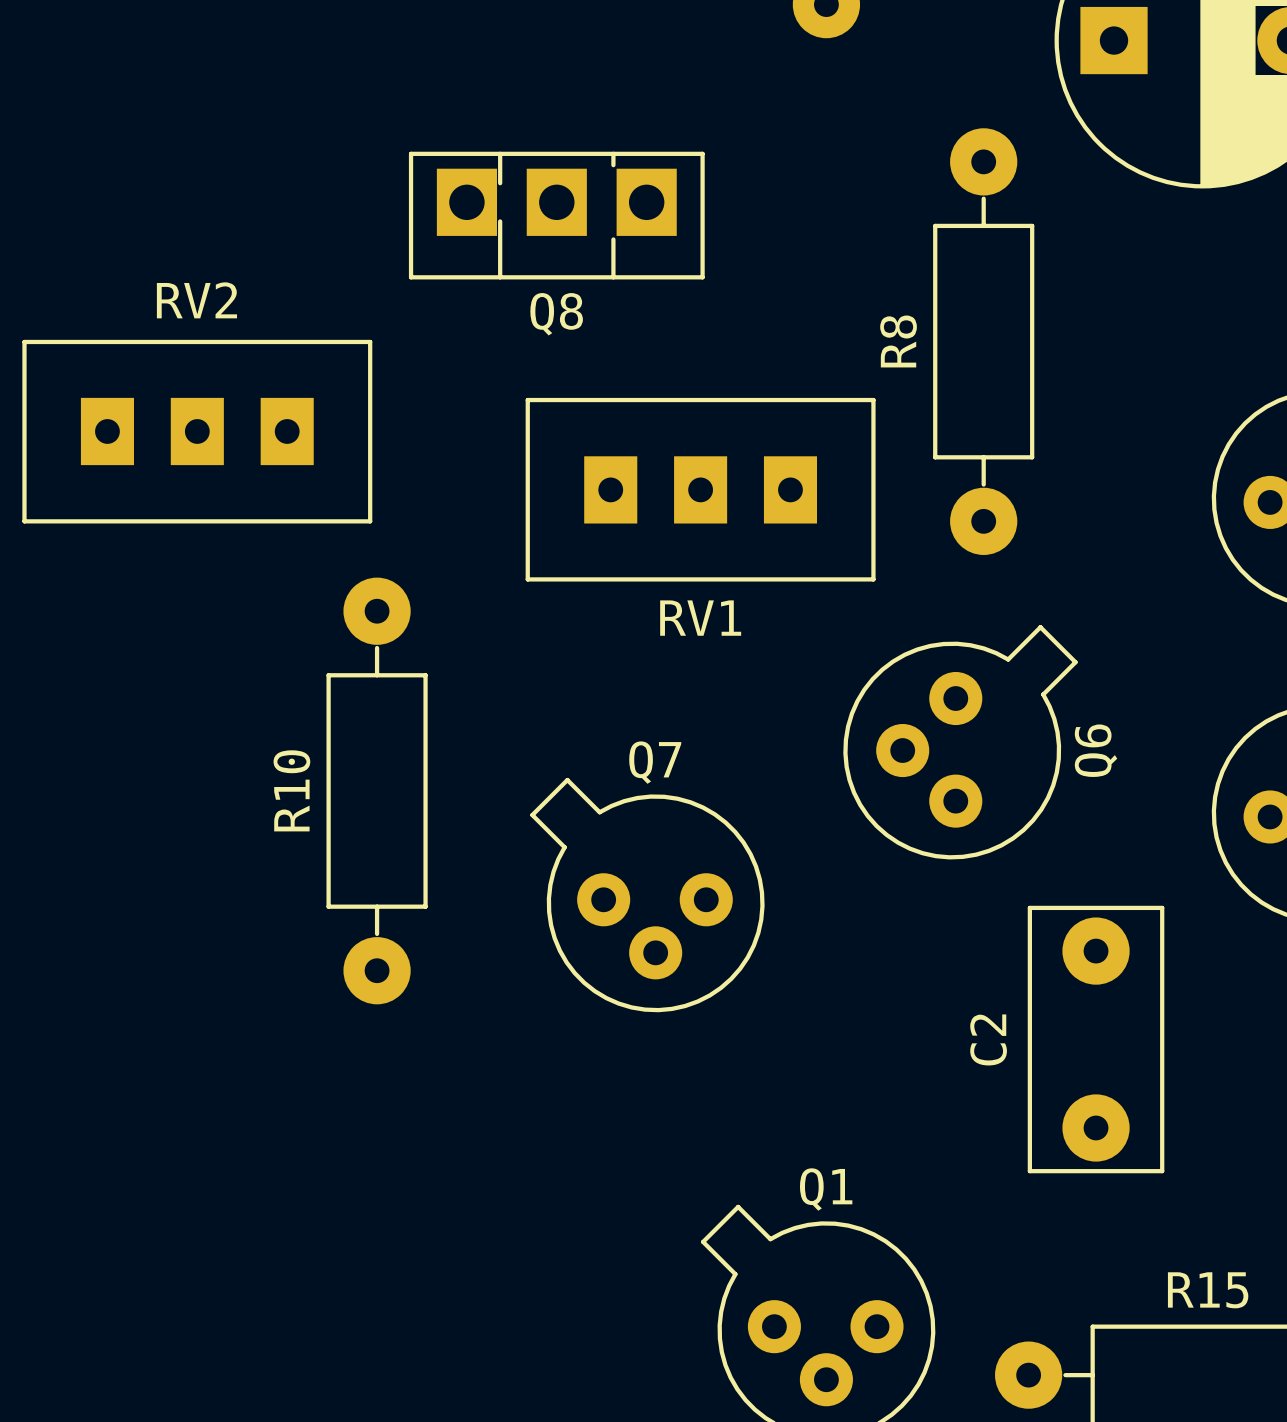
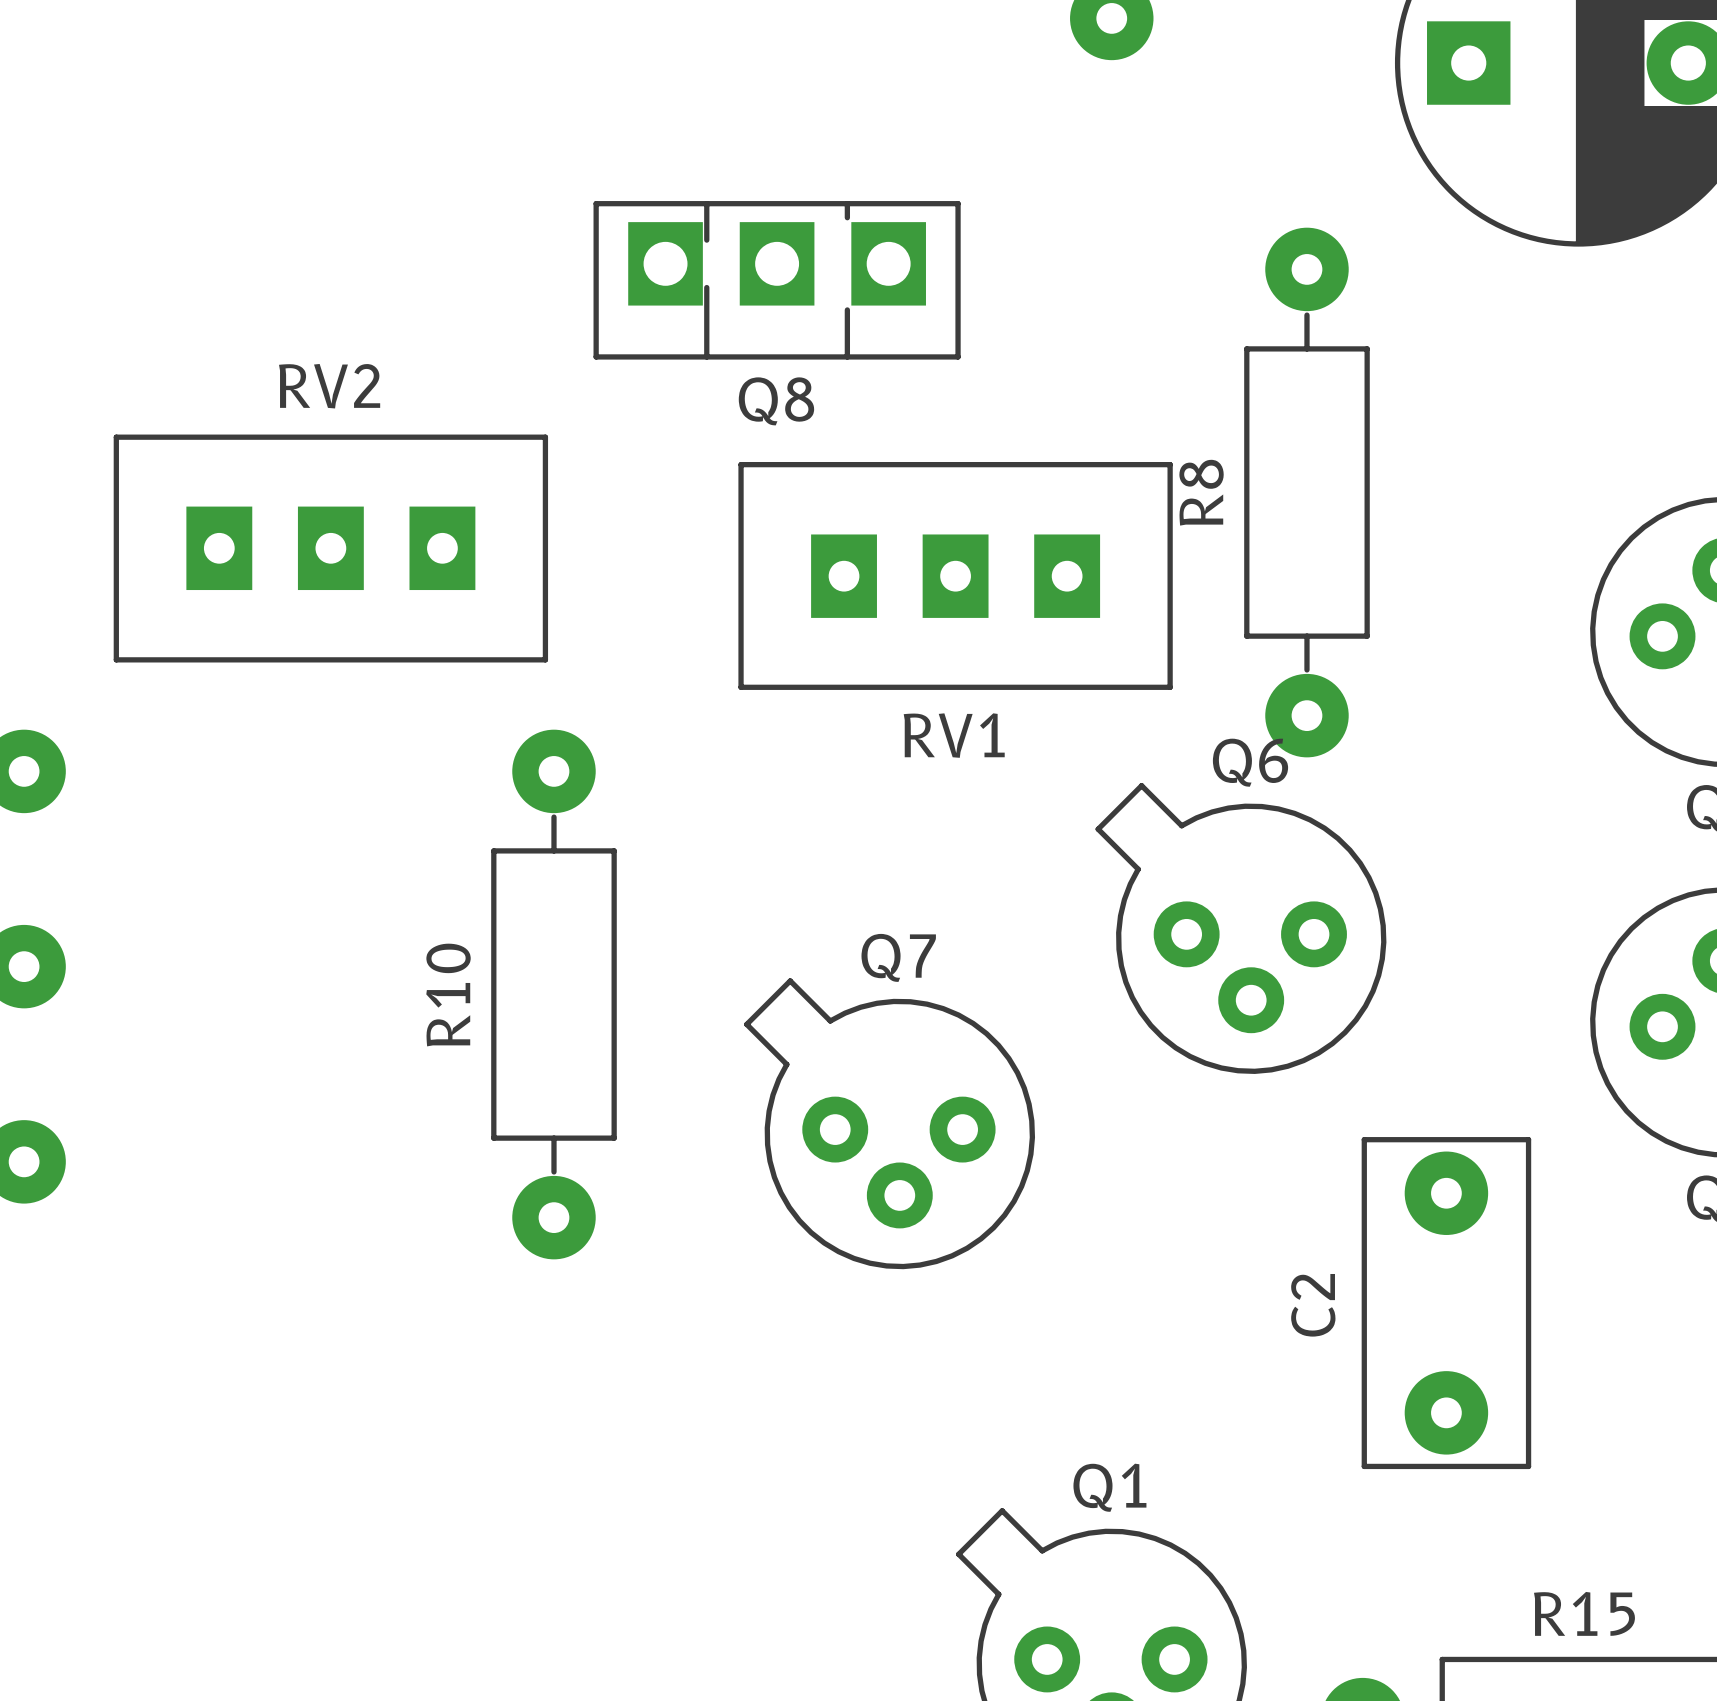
R8 position: (983, 341) -> (1306, 492)
RV1 position: (700, 489) -> (955, 575)
Q6 footprint: [843, 625, 1078, 860] -> [1095, 783, 1387, 1074]
Q6 name position: Q6 (1096, 750) -> Q6 (1250, 762)

